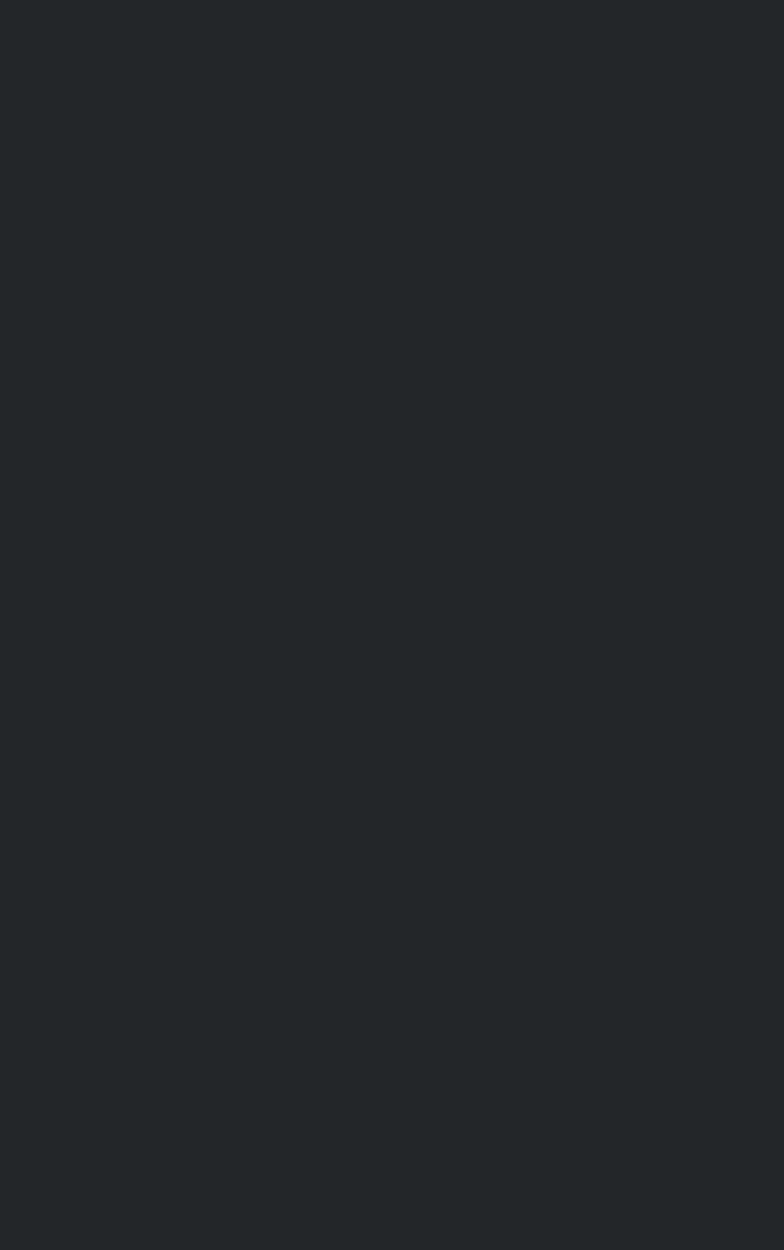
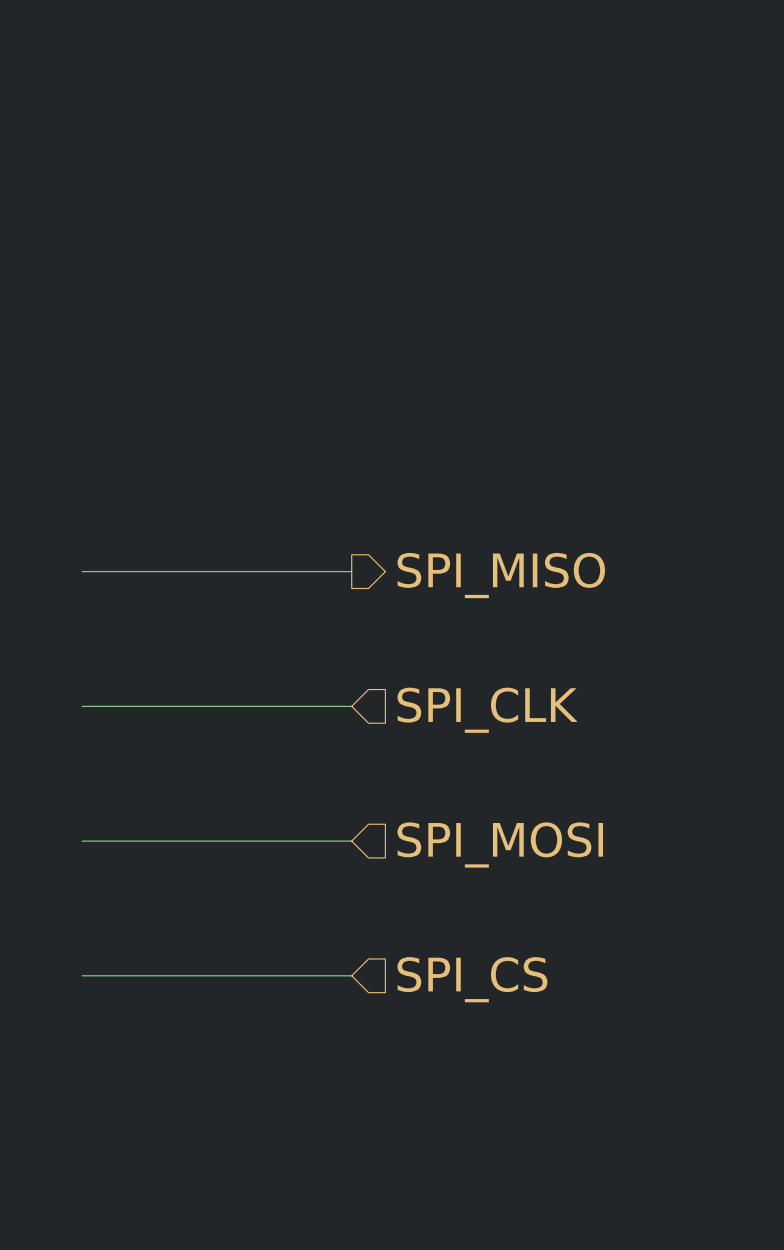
wire: none -> (82, 571) (351, 571)
hierarchical label: none -> SPI_MISO (501, 575)
wire: none -> (82, 706) (351, 706)
hierarchical label: none -> SPI_CLK (487, 710)
wire: none -> (82, 841) (351, 841)
hierarchical label: none -> SPI_MOSI (500, 844)
wire: none -> (82, 975) (351, 975)
hierarchical label: none -> SPI_CS (472, 979)

